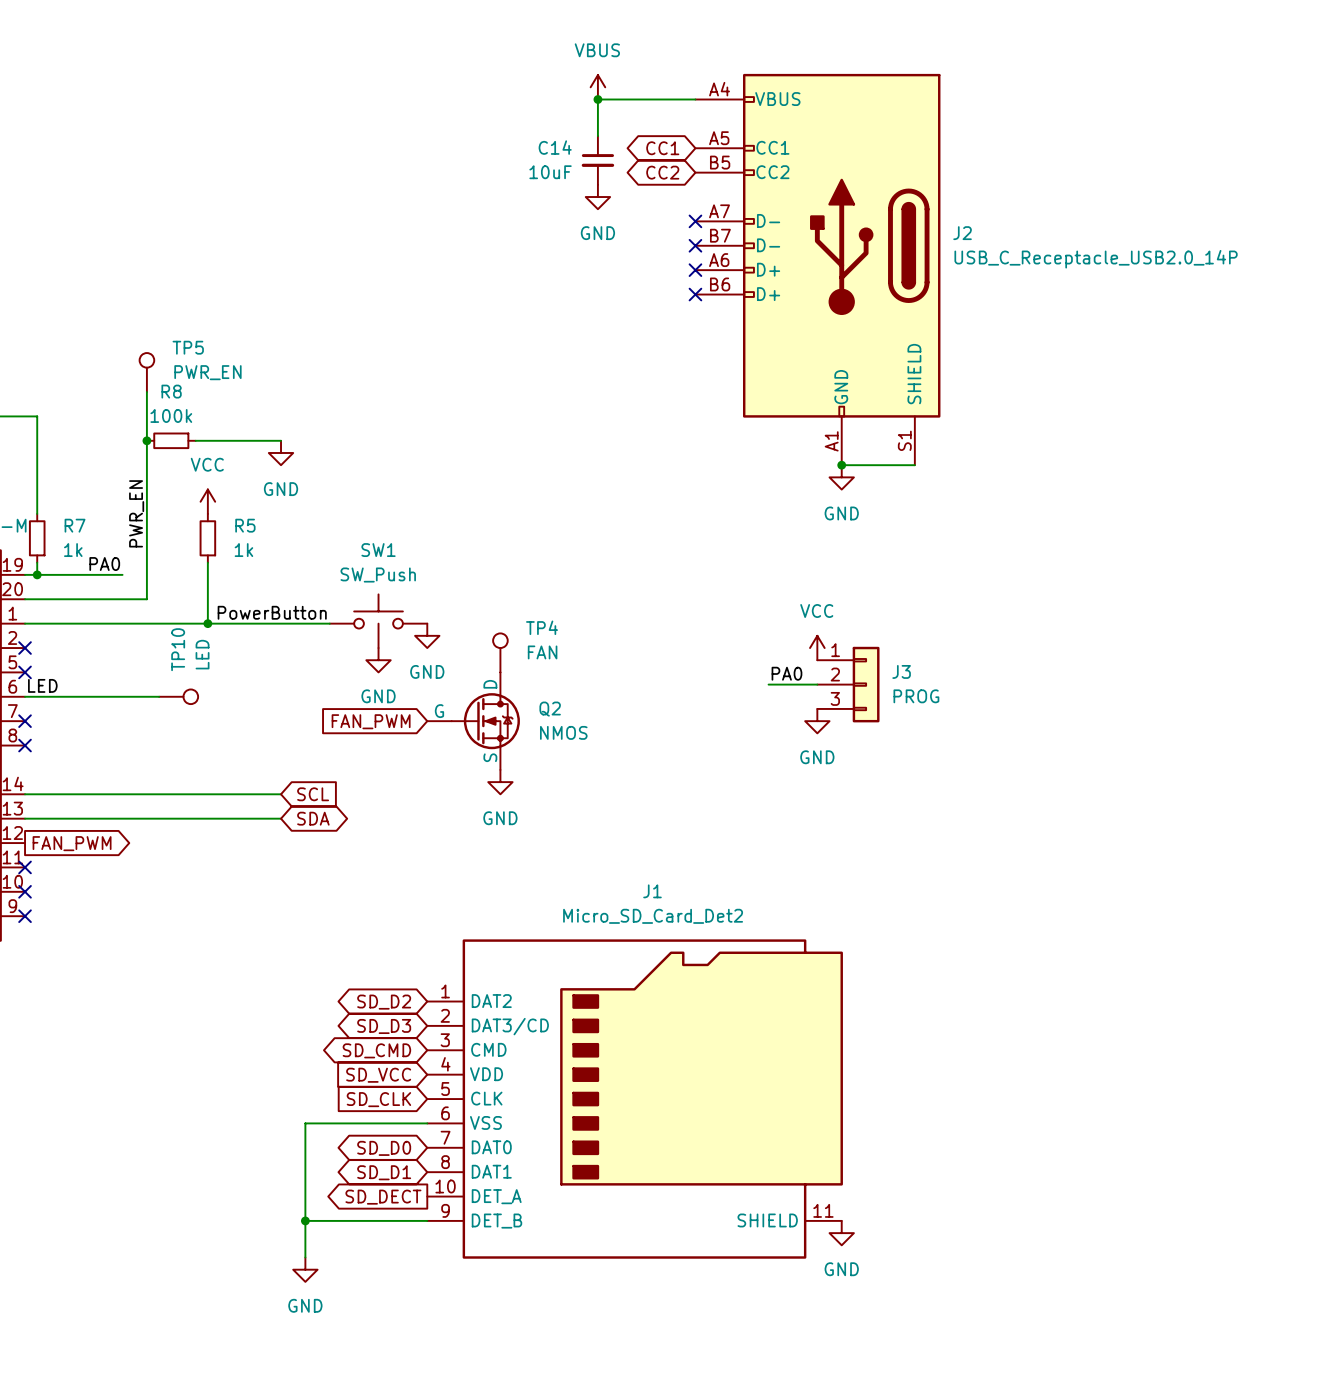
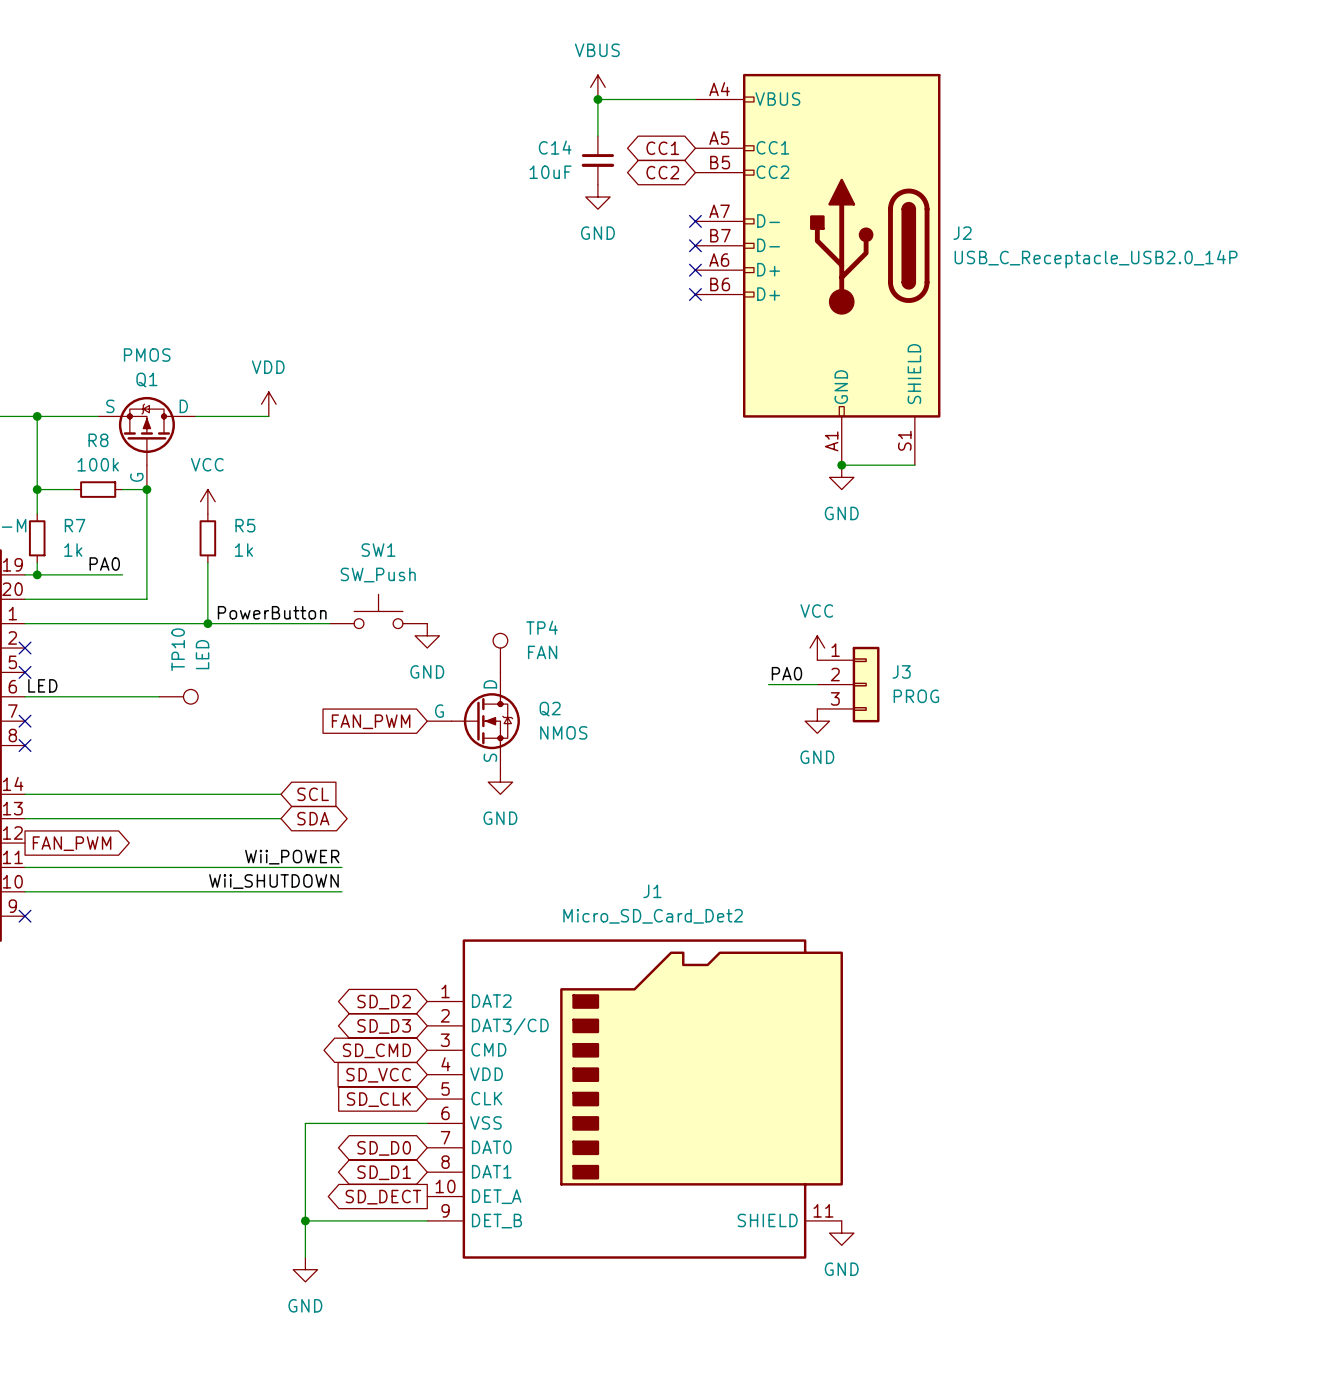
TP5: PWR_EN (146, 372) -> none
power symbol: none -> VDD (268, 404)
wire: none -> (37, 416) (98, 416)
junction: none -> (37, 416)
wire: none -> (195, 416) (268, 416)
junction position: (146, 440) -> (146, 489)
R8 position: (171, 440) -> (98, 489)
wire: (195, 440) (281, 440) -> none
Q1: none -> PMOS (146, 443)
power symbol: GND (281, 452) -> none
wire: none -> (37, 489) (73, 489)
junction: none -> (37, 489)
label: PWR_EN (136, 513) -> none
SW1 symbol: [329, 594, 428, 649] -> [329, 594, 428, 629]
power symbol: GND (378, 660) -> none
label: none -> Wii_POWER (292, 857)
wire: none -> (25, 867) (341, 867)
no-connect mark: (25, 867) -> none
label: none -> Wii_SHUTDOWN (273, 881)
wire: none -> (25, 891) (341, 891)
no-connect mark: (25, 891) -> none

